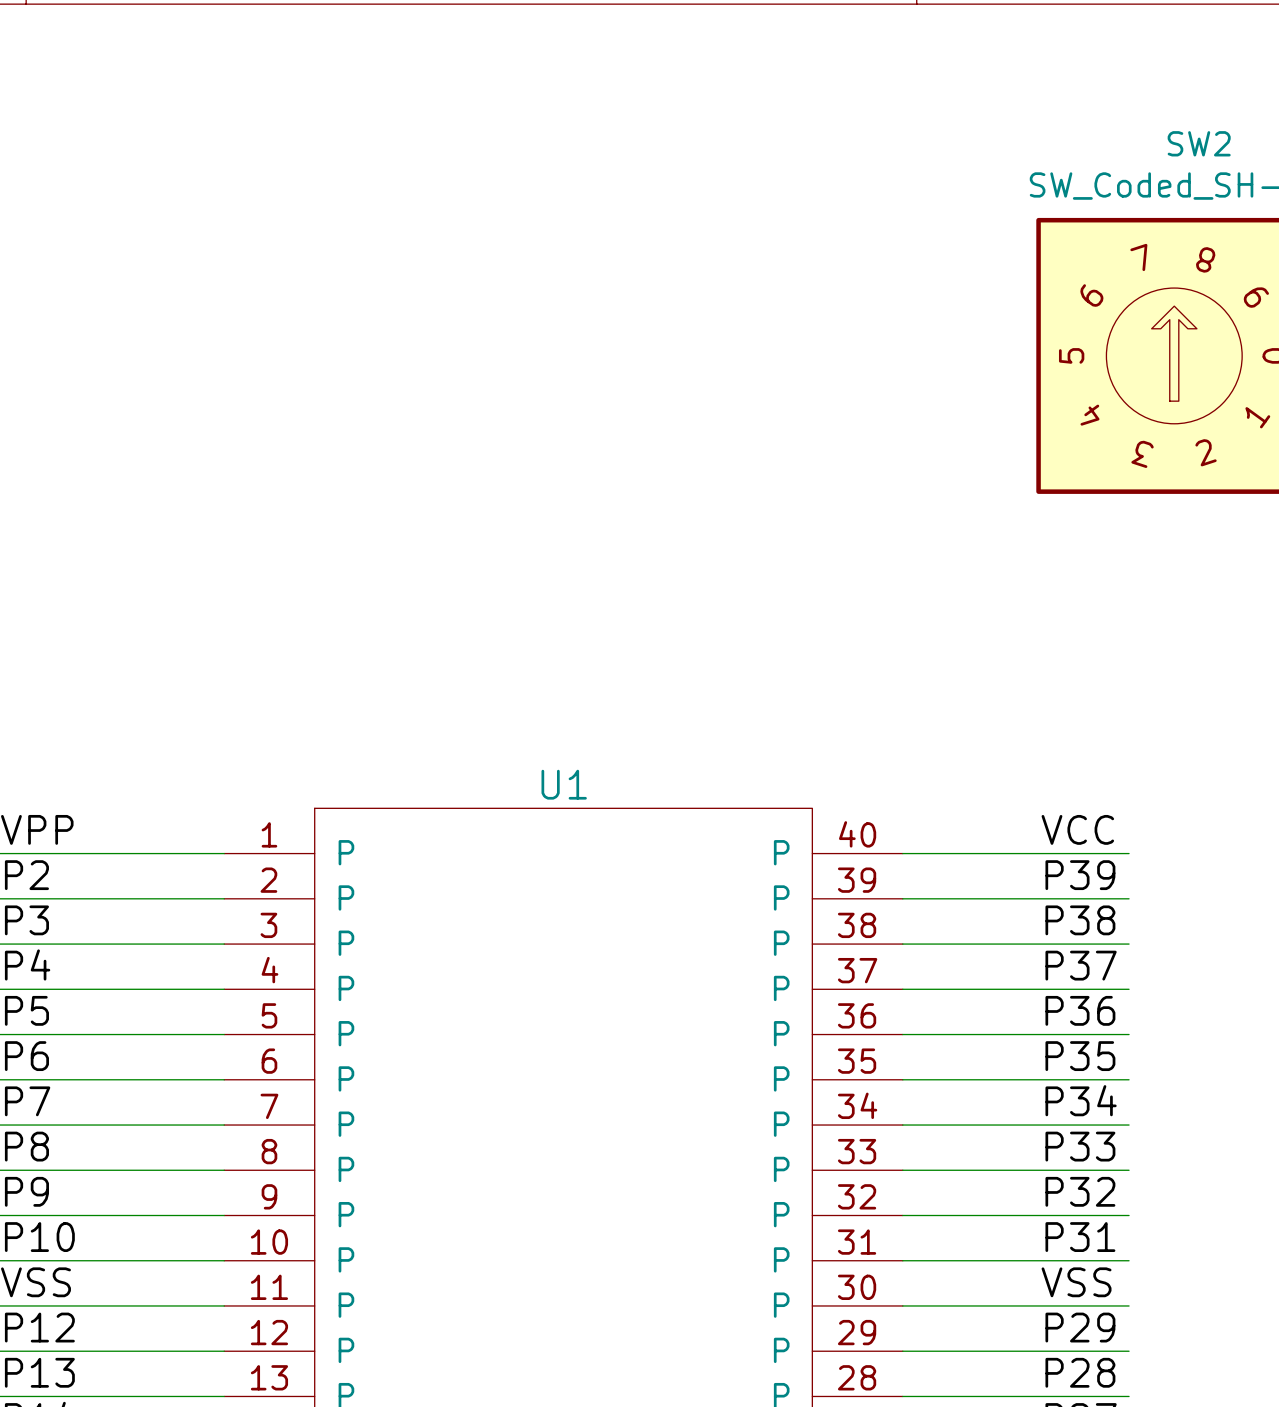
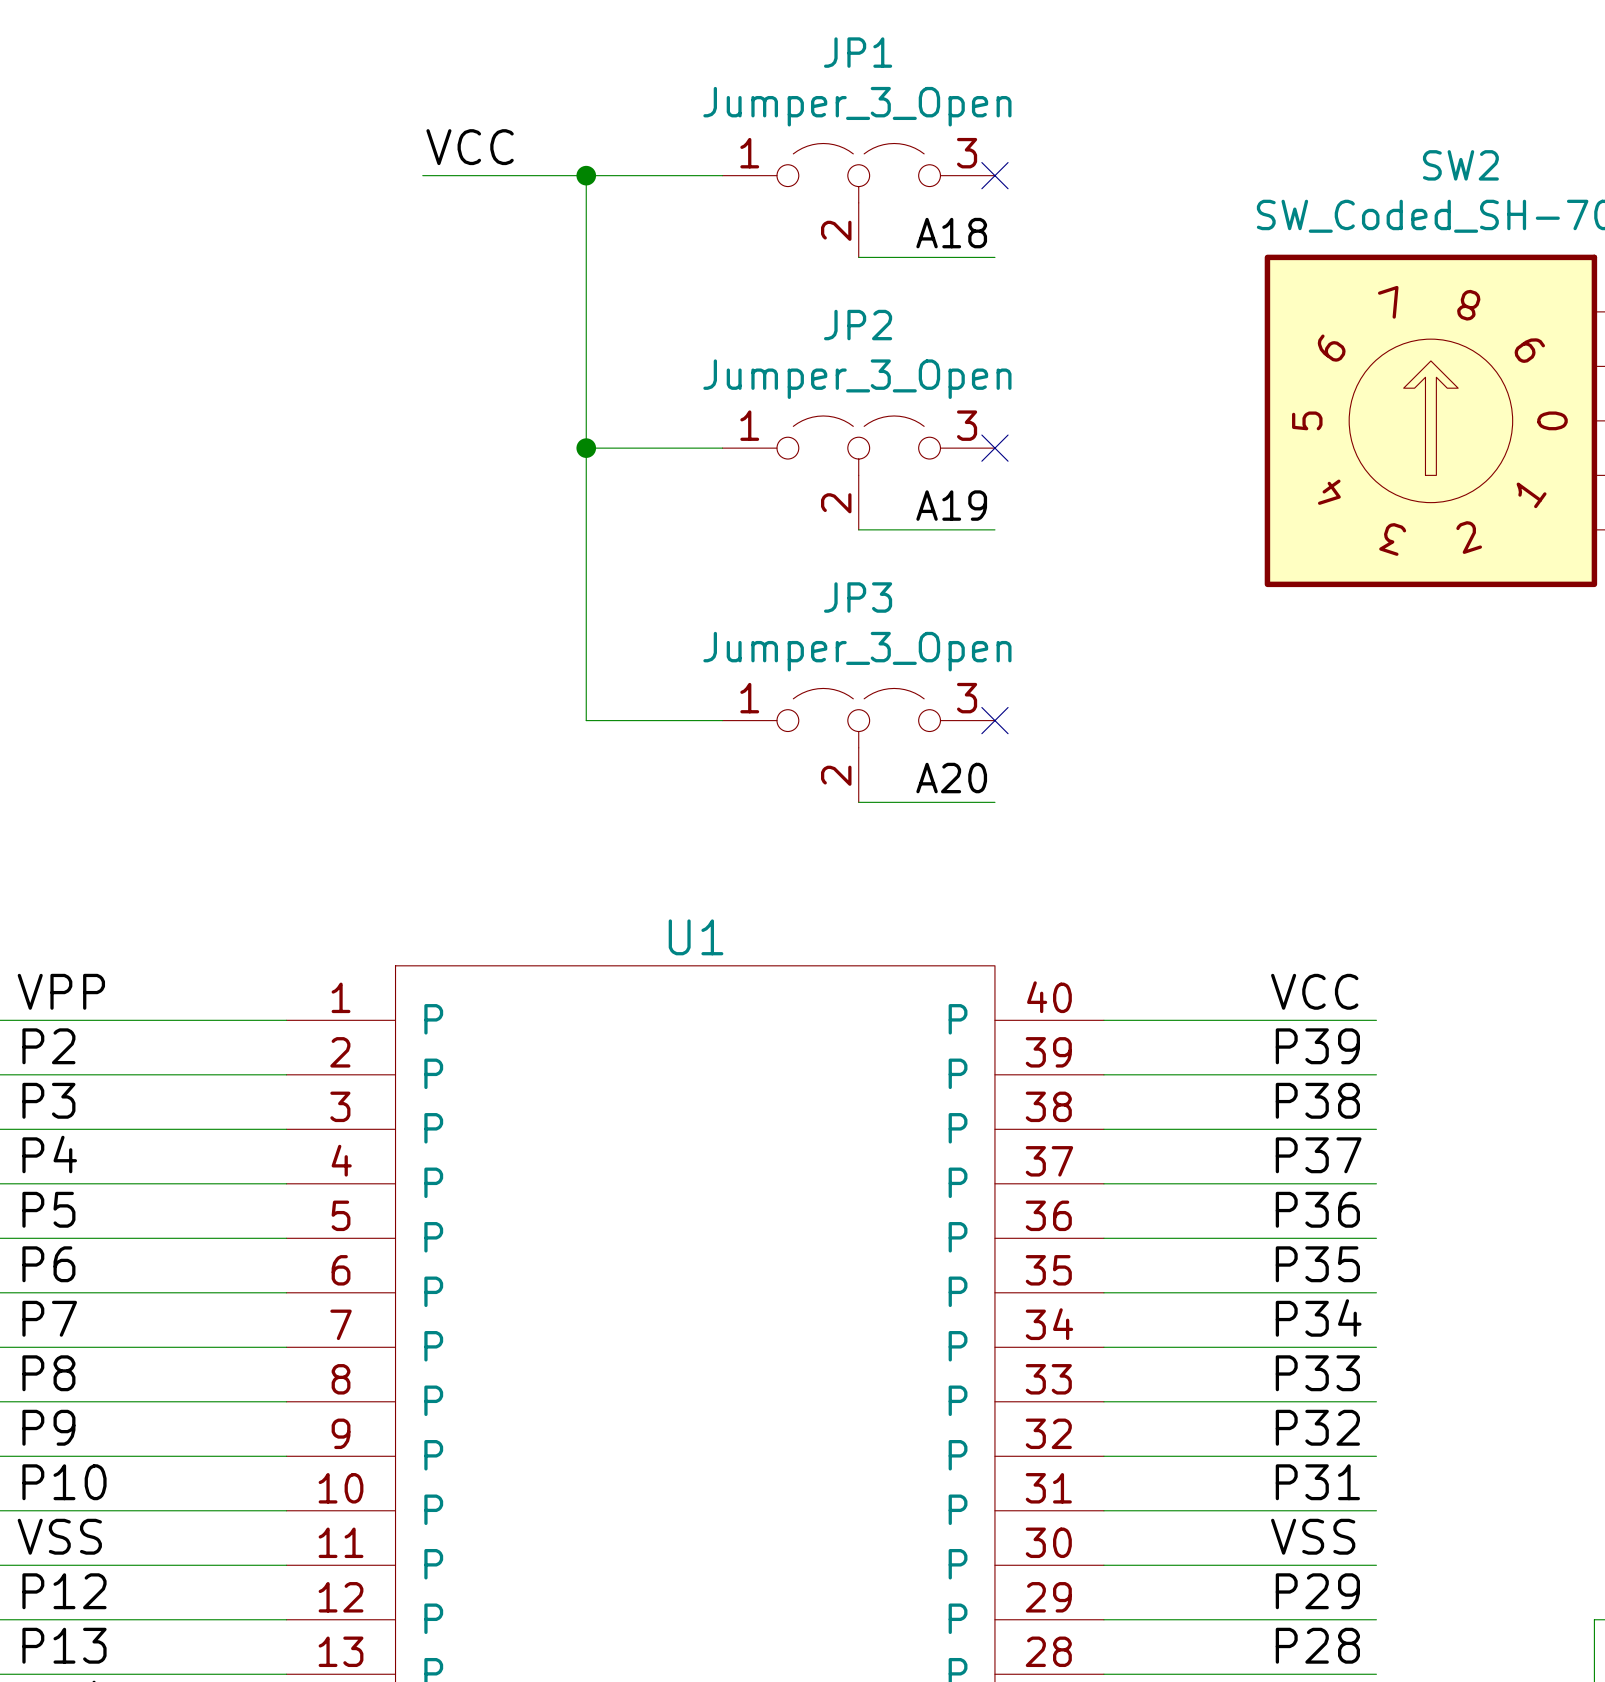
label: none -> VCC (470, 147)
wire: none -> (422, 175) (722, 175)
wire: none -> (586, 175) (586, 720) (722, 720)
junction: none -> (586, 175)
no-connect mark: none -> (994, 175)
JP1: none -> Jumper_3_Open (858, 200)
label: none -> A18 (951, 233)
wire: none -> (858, 257) (994, 257)
wire: none -> (586, 448) (722, 448)
junction: none -> (586, 448)
no-connect mark: none -> (994, 448)
JP2: none -> Jumper_3_Open (858, 472)
label: none -> A19 (951, 505)
wire: none -> (858, 529) (994, 529)
no-connect mark: none -> (994, 720)
JP3: none -> Jumper_3_Open (858, 745)
label: none -> A20 (951, 778)
wire: none -> (858, 802) (994, 802)

